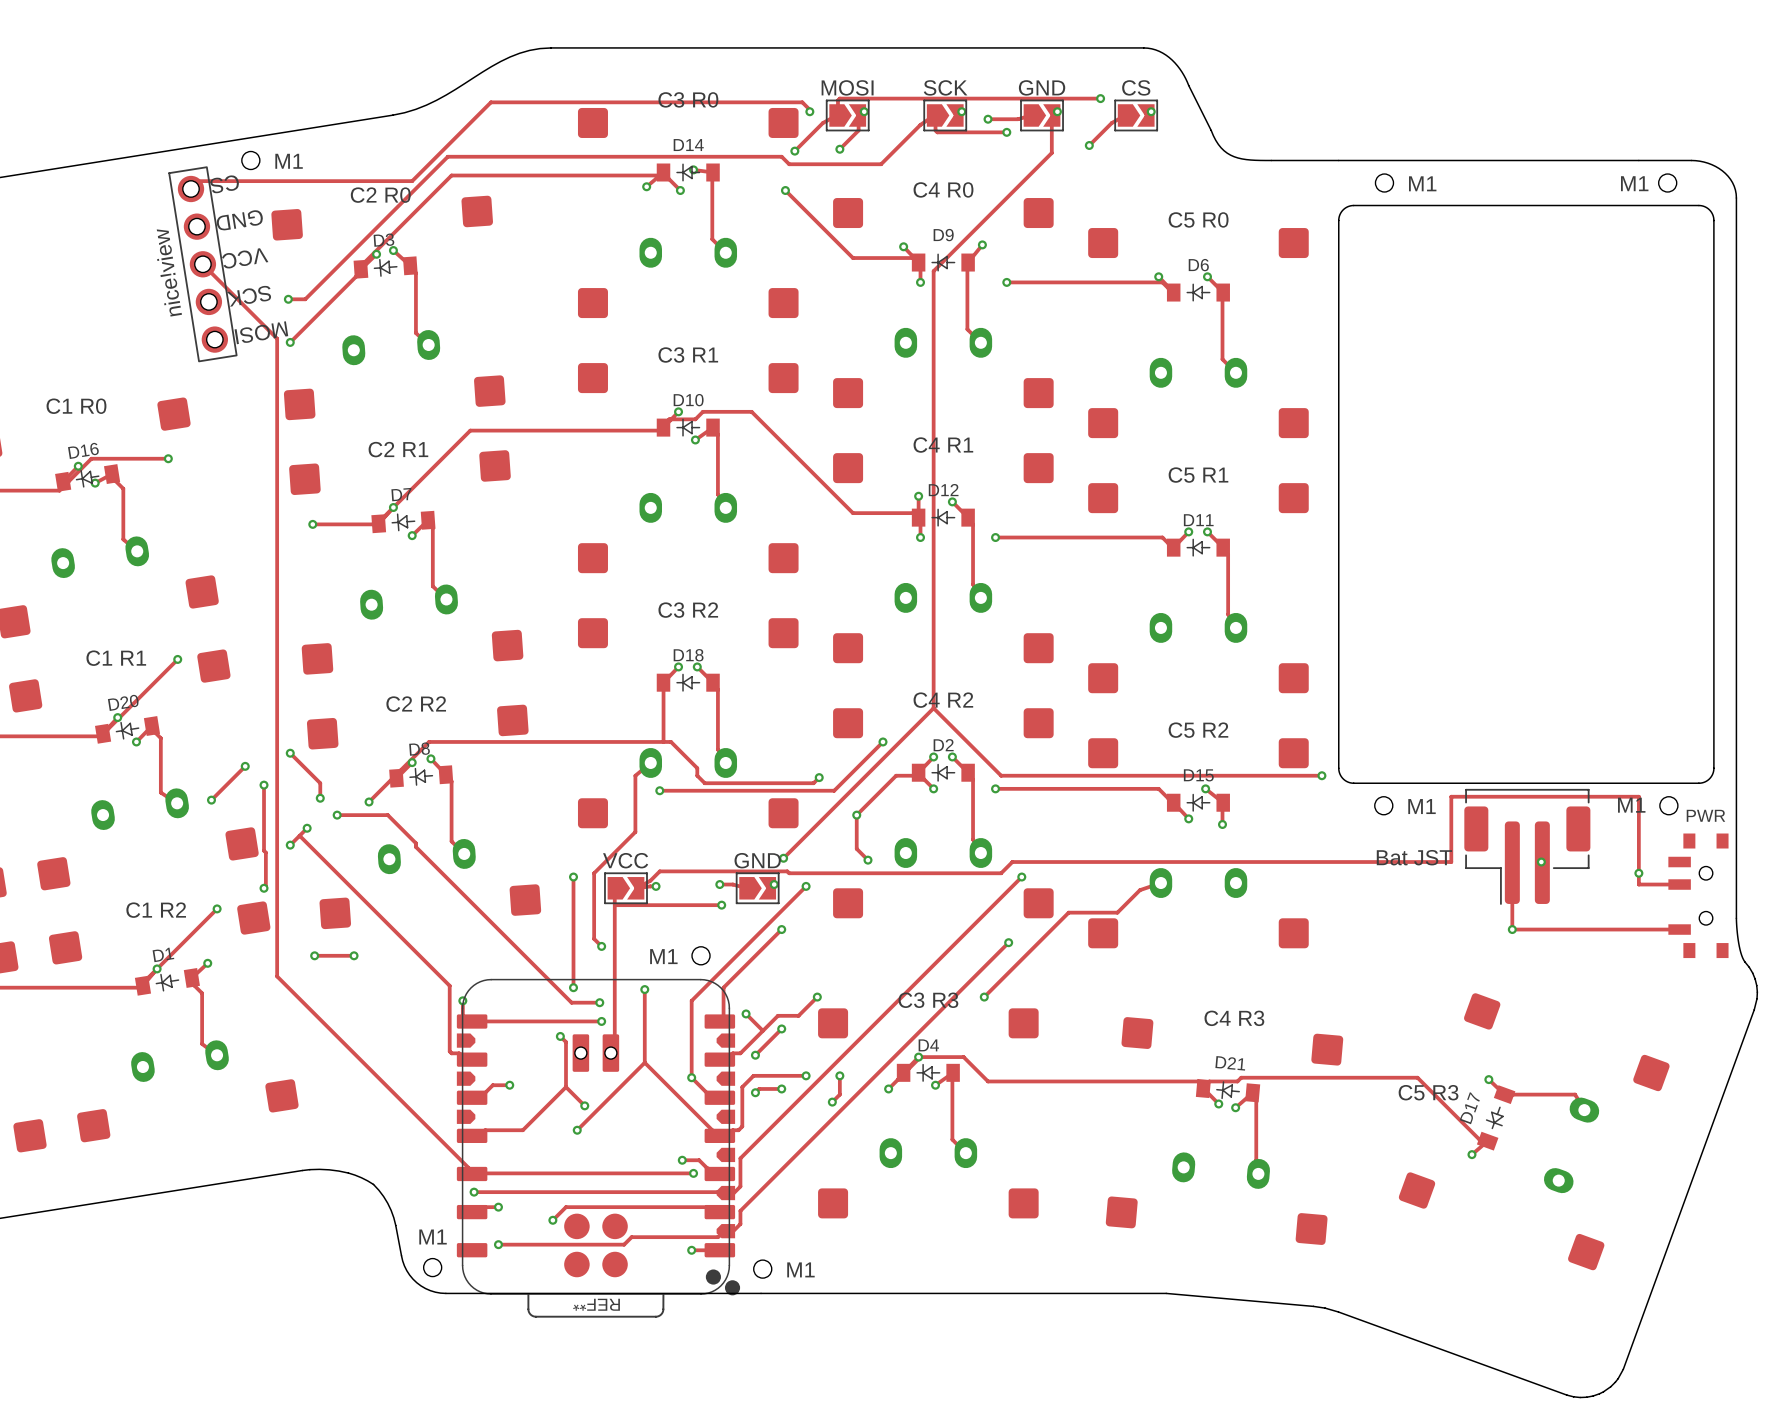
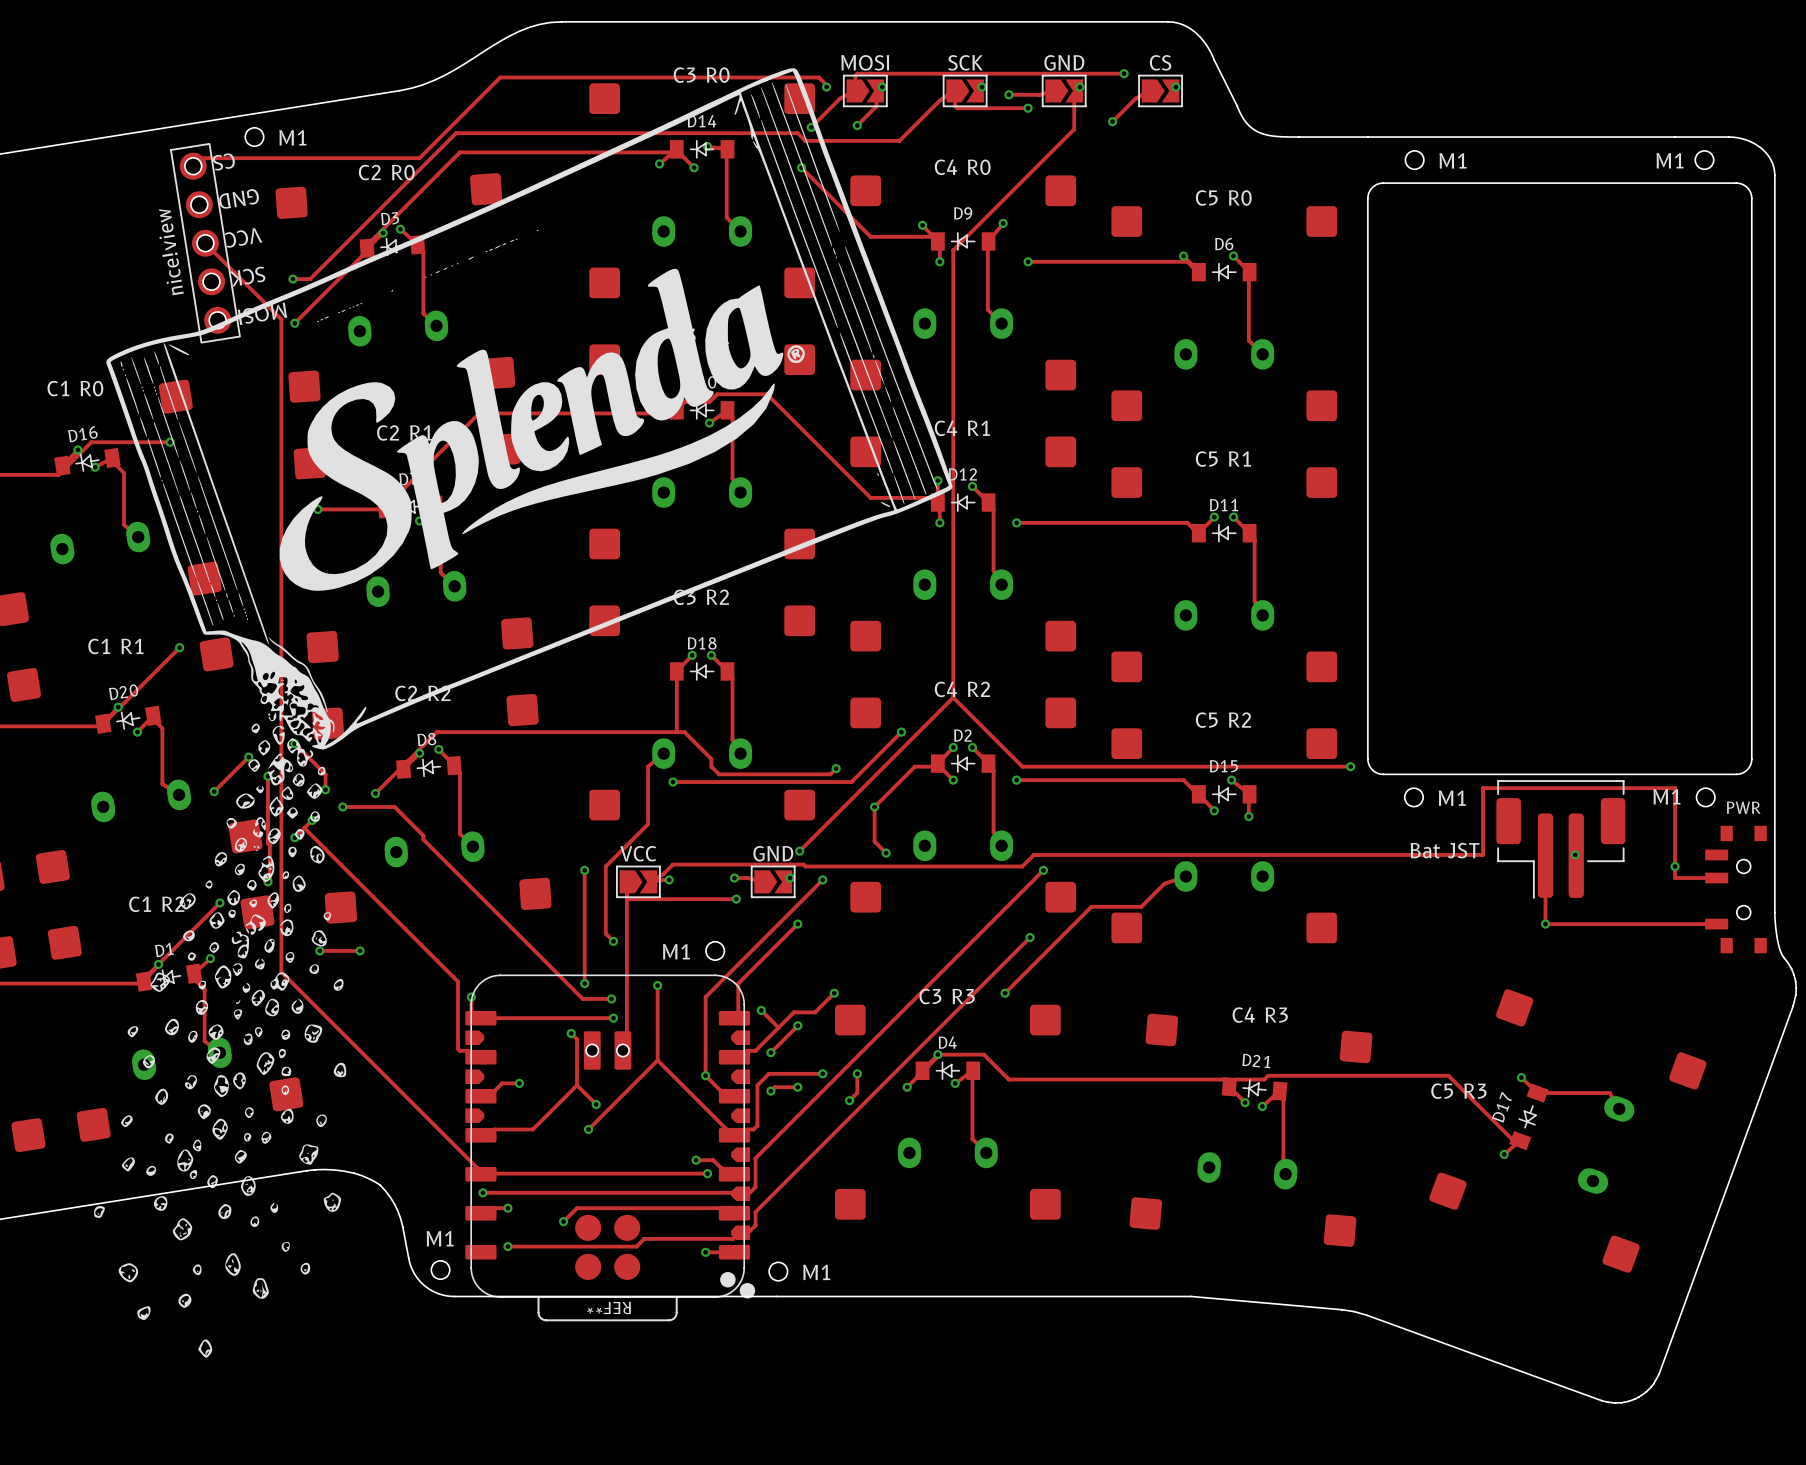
drawing: none -> [106, 68, 953, 1228]
drawing: none -> [150, 972, 171, 992]
drawing: none -> [127, 1026, 155, 1069]
drawing: none -> [333, 1062, 347, 1078]
drawing: none -> [299, 1114, 327, 1165]
drawing: none -> [120, 1115, 133, 1128]
drawing: none -> [121, 1157, 157, 1176]
drawing: none -> [323, 1192, 341, 1212]
drawing: none -> [154, 1196, 193, 1241]
drawing: none -> [93, 1206, 105, 1218]
drawing: none -> [281, 1242, 311, 1275]
drawing: none -> [225, 1253, 269, 1299]
drawing: none -> [118, 1263, 139, 1283]
drawing: none -> [192, 1264, 202, 1276]
drawing: none -> [178, 1293, 192, 1308]
drawing: none -> [137, 1306, 151, 1320]
drawing: none -> [198, 1339, 213, 1358]

